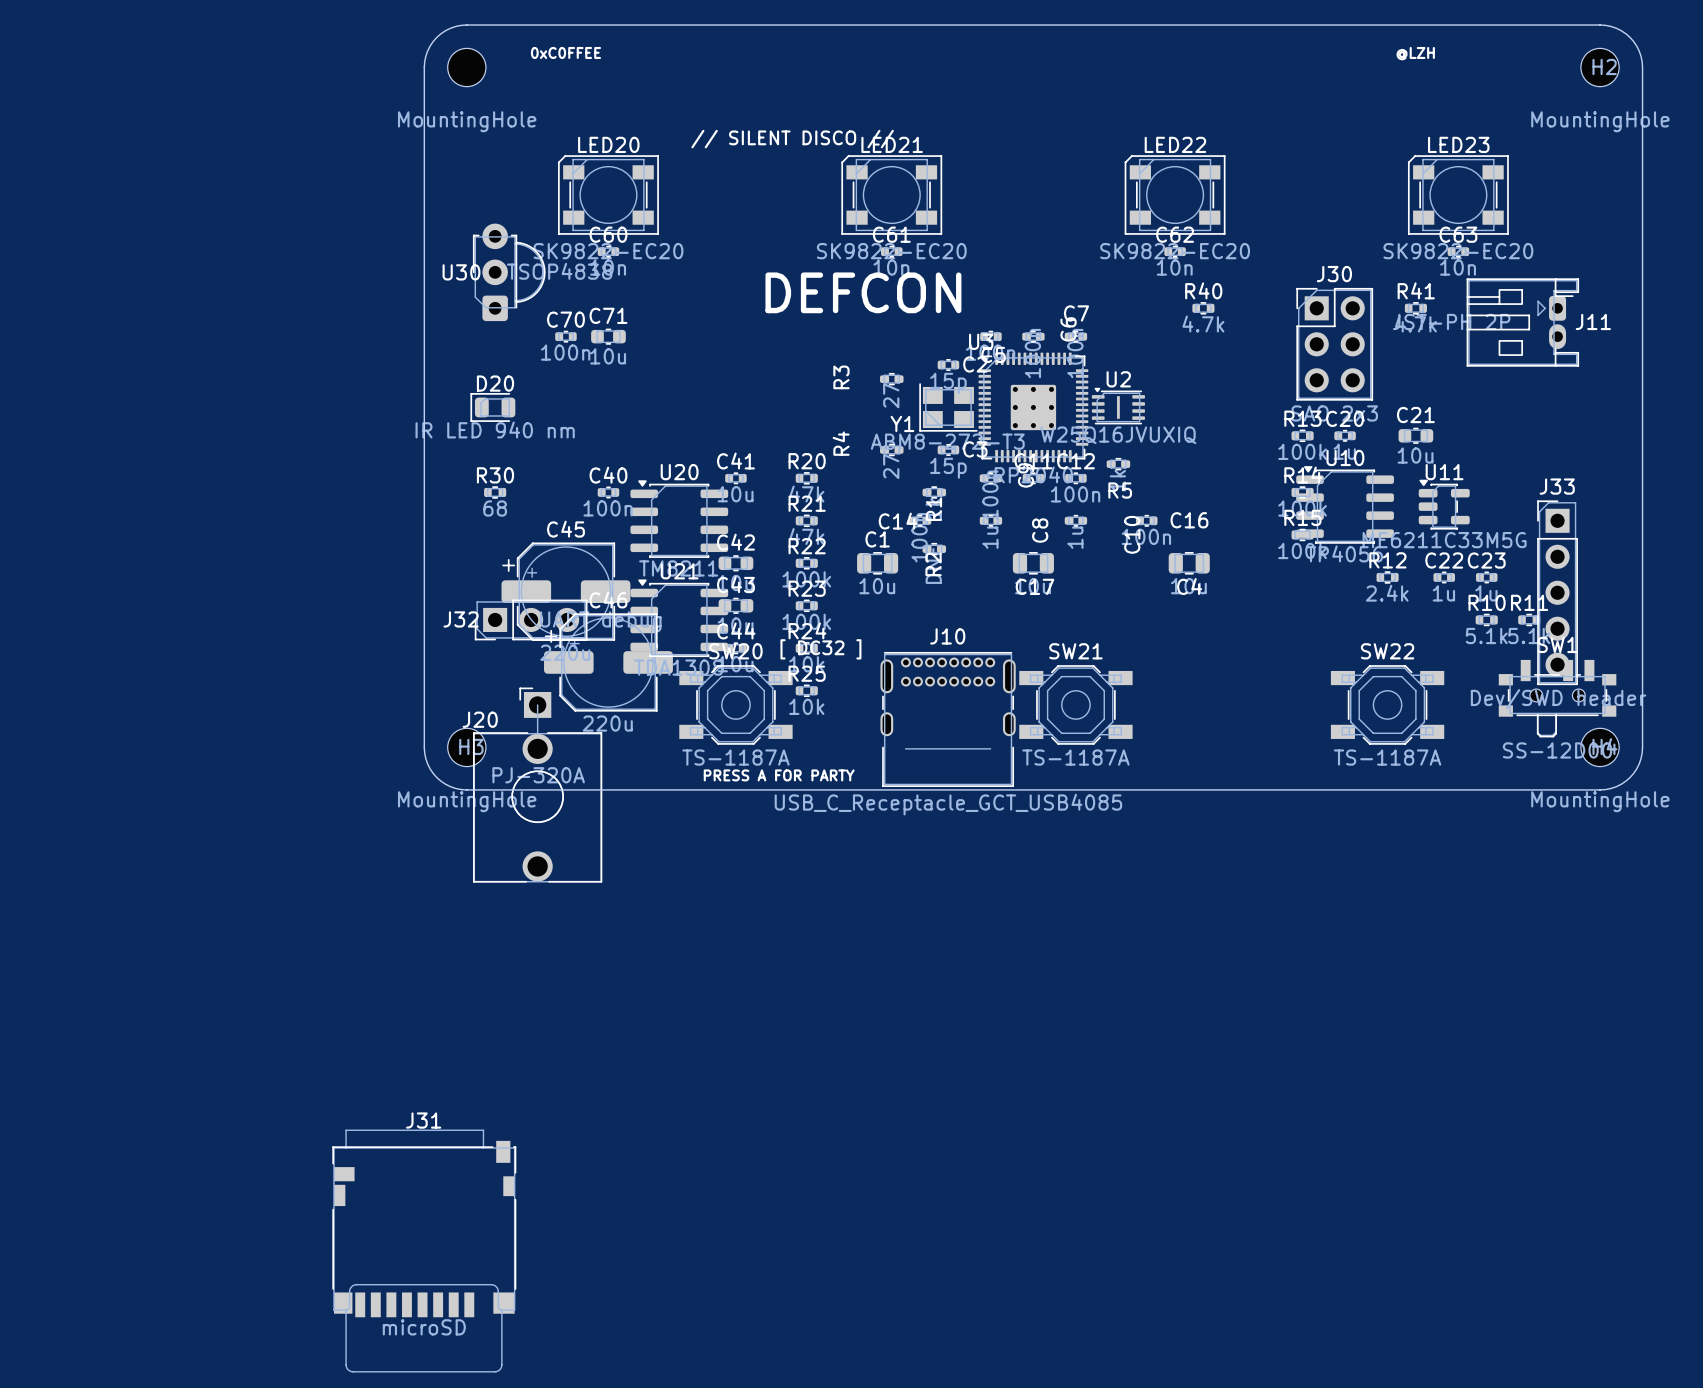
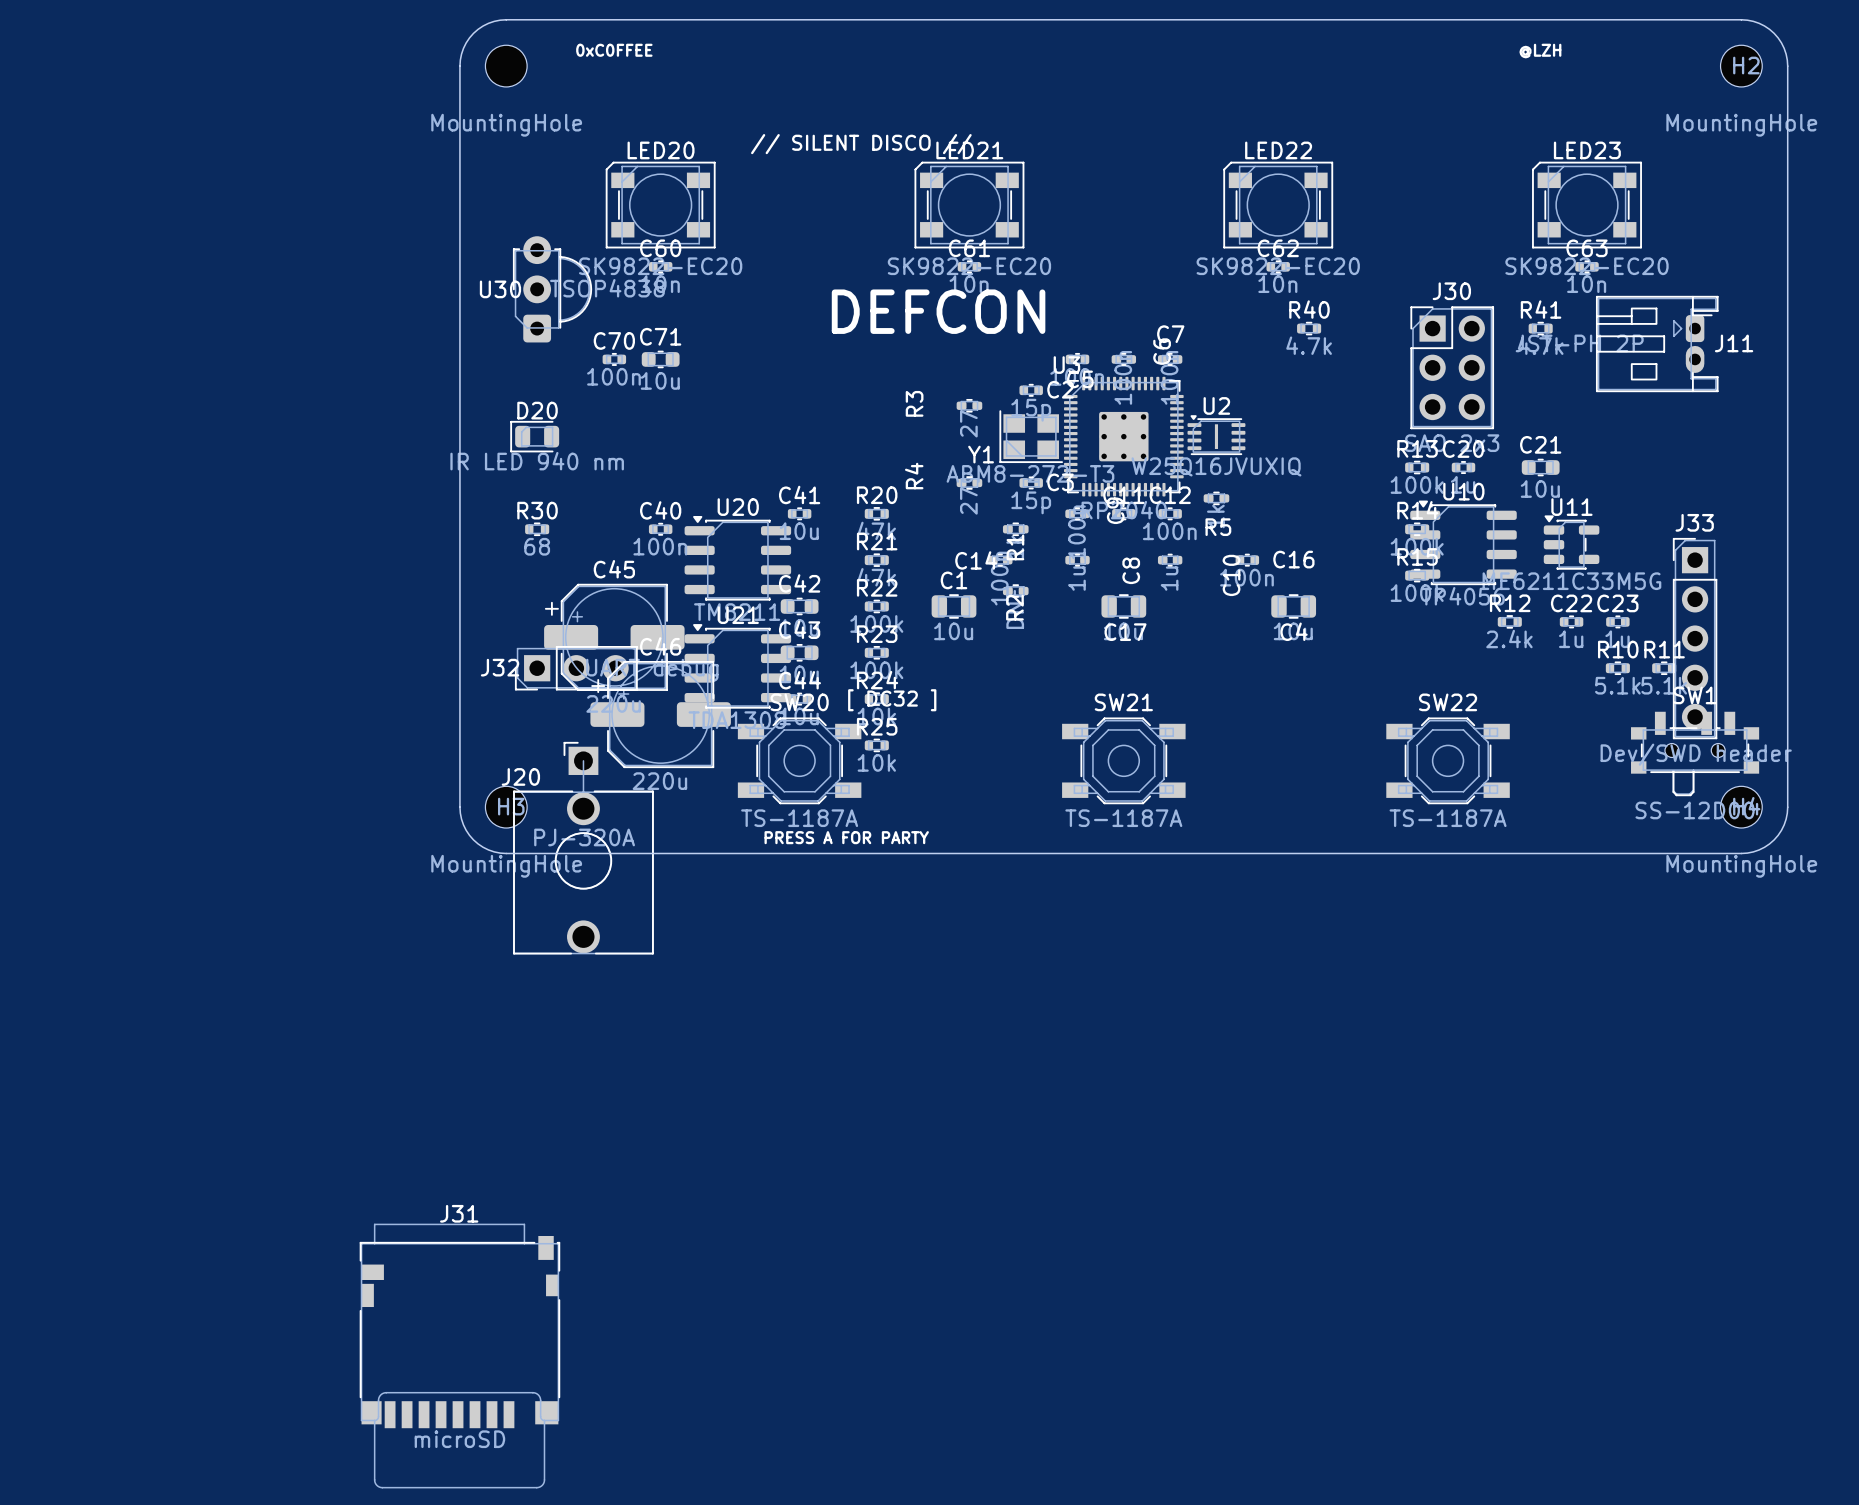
SW21 position: (1075, 704) -> (1123, 760)
SW22 position: (1387, 704) -> (1448, 760)
J10: USB_C_Receptacle_GCT_USB4085 (948, 719) -> none

